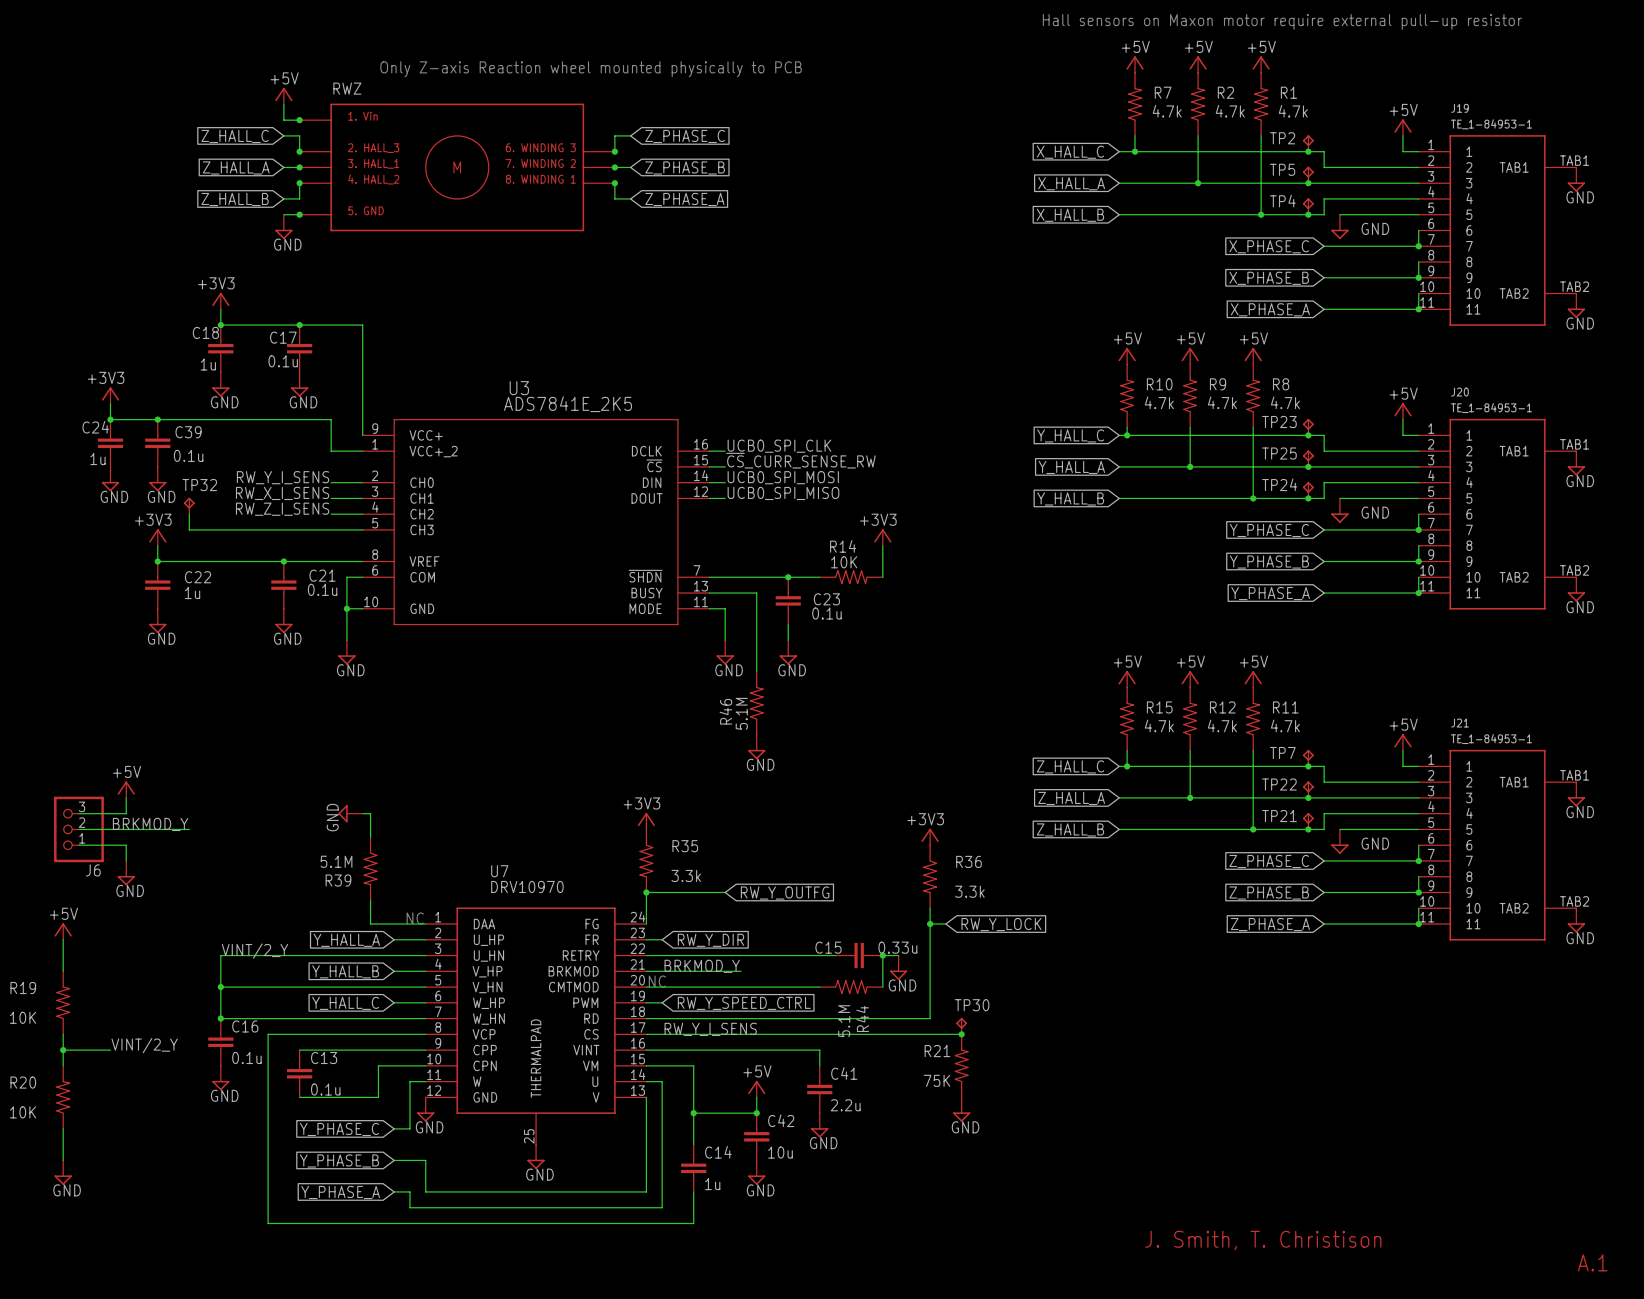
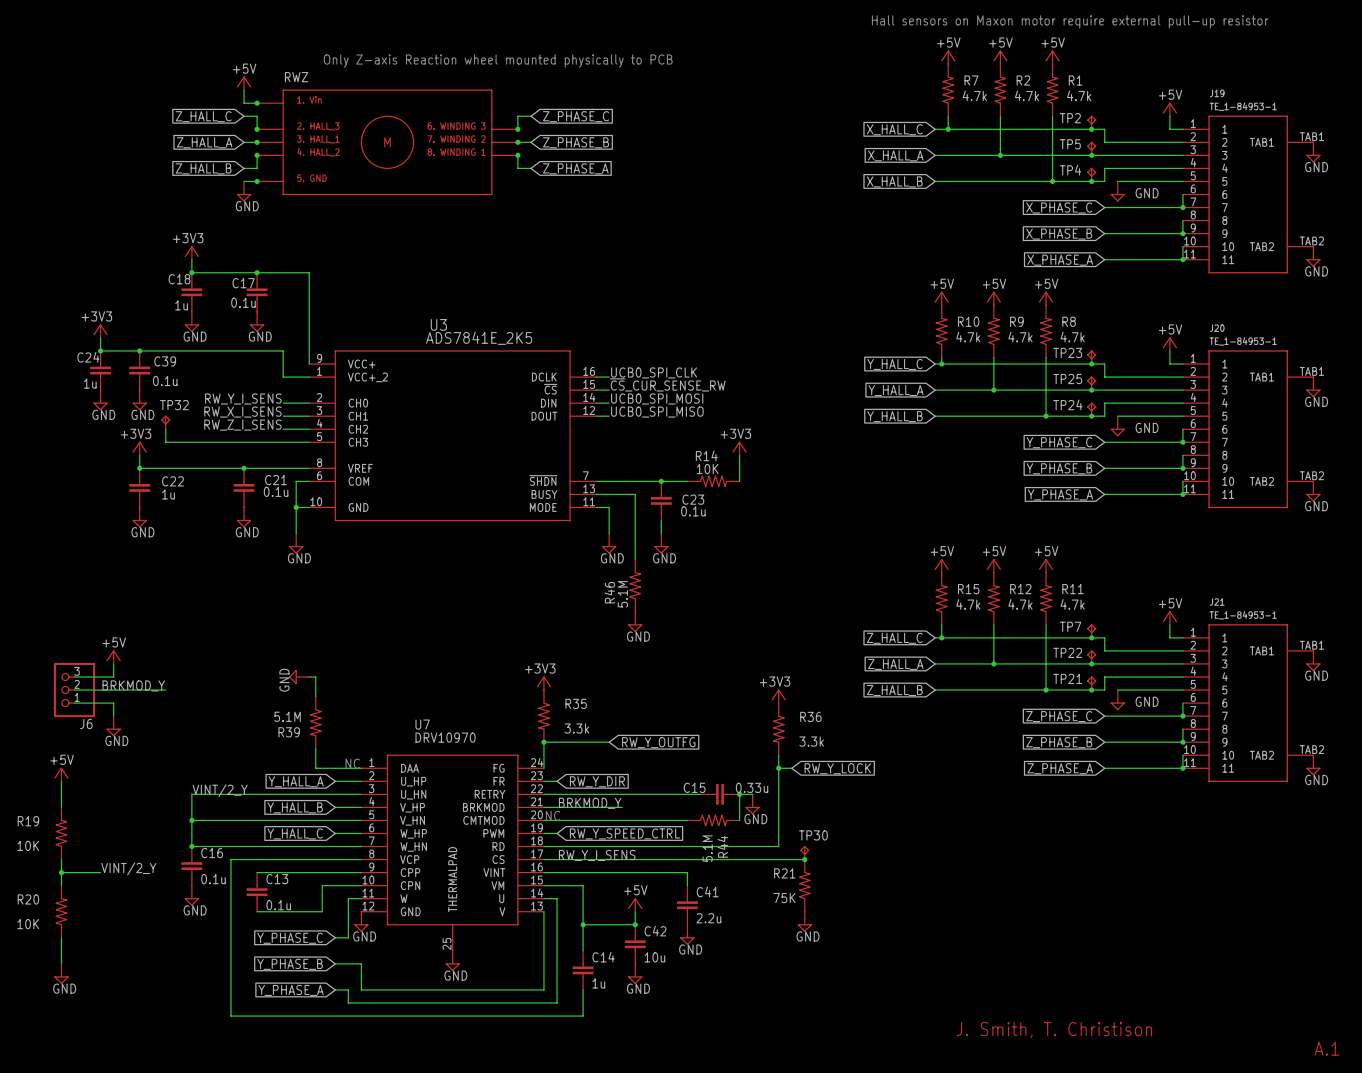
label: ~{CS}_CURR_SENSE_RW (800, 460) -> ~{CS}_CUR_SENSE_RW (667, 384)

